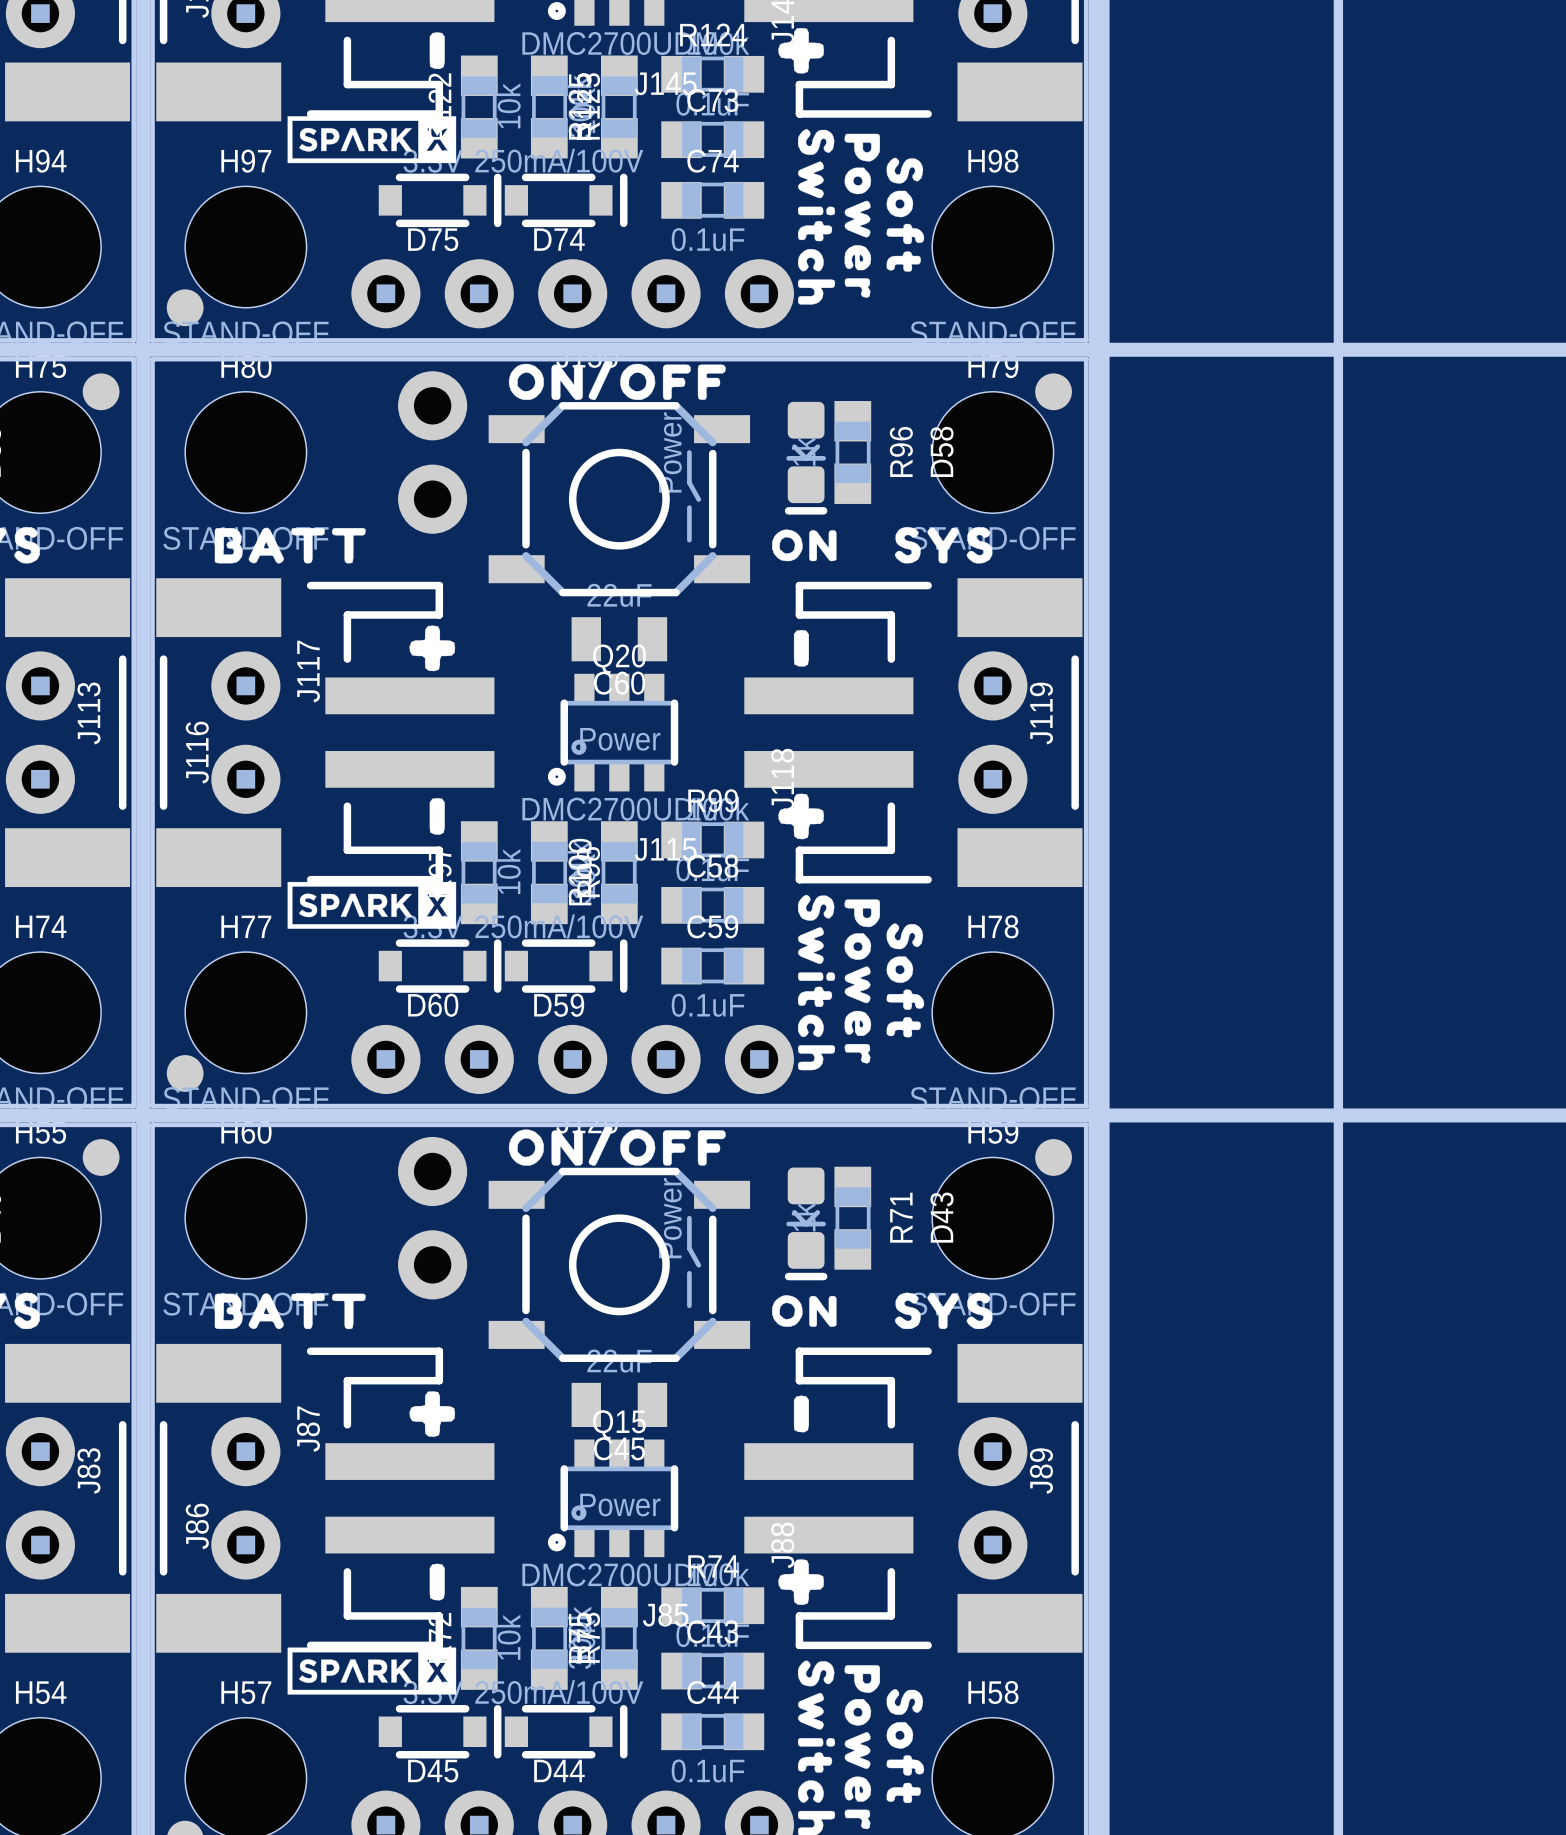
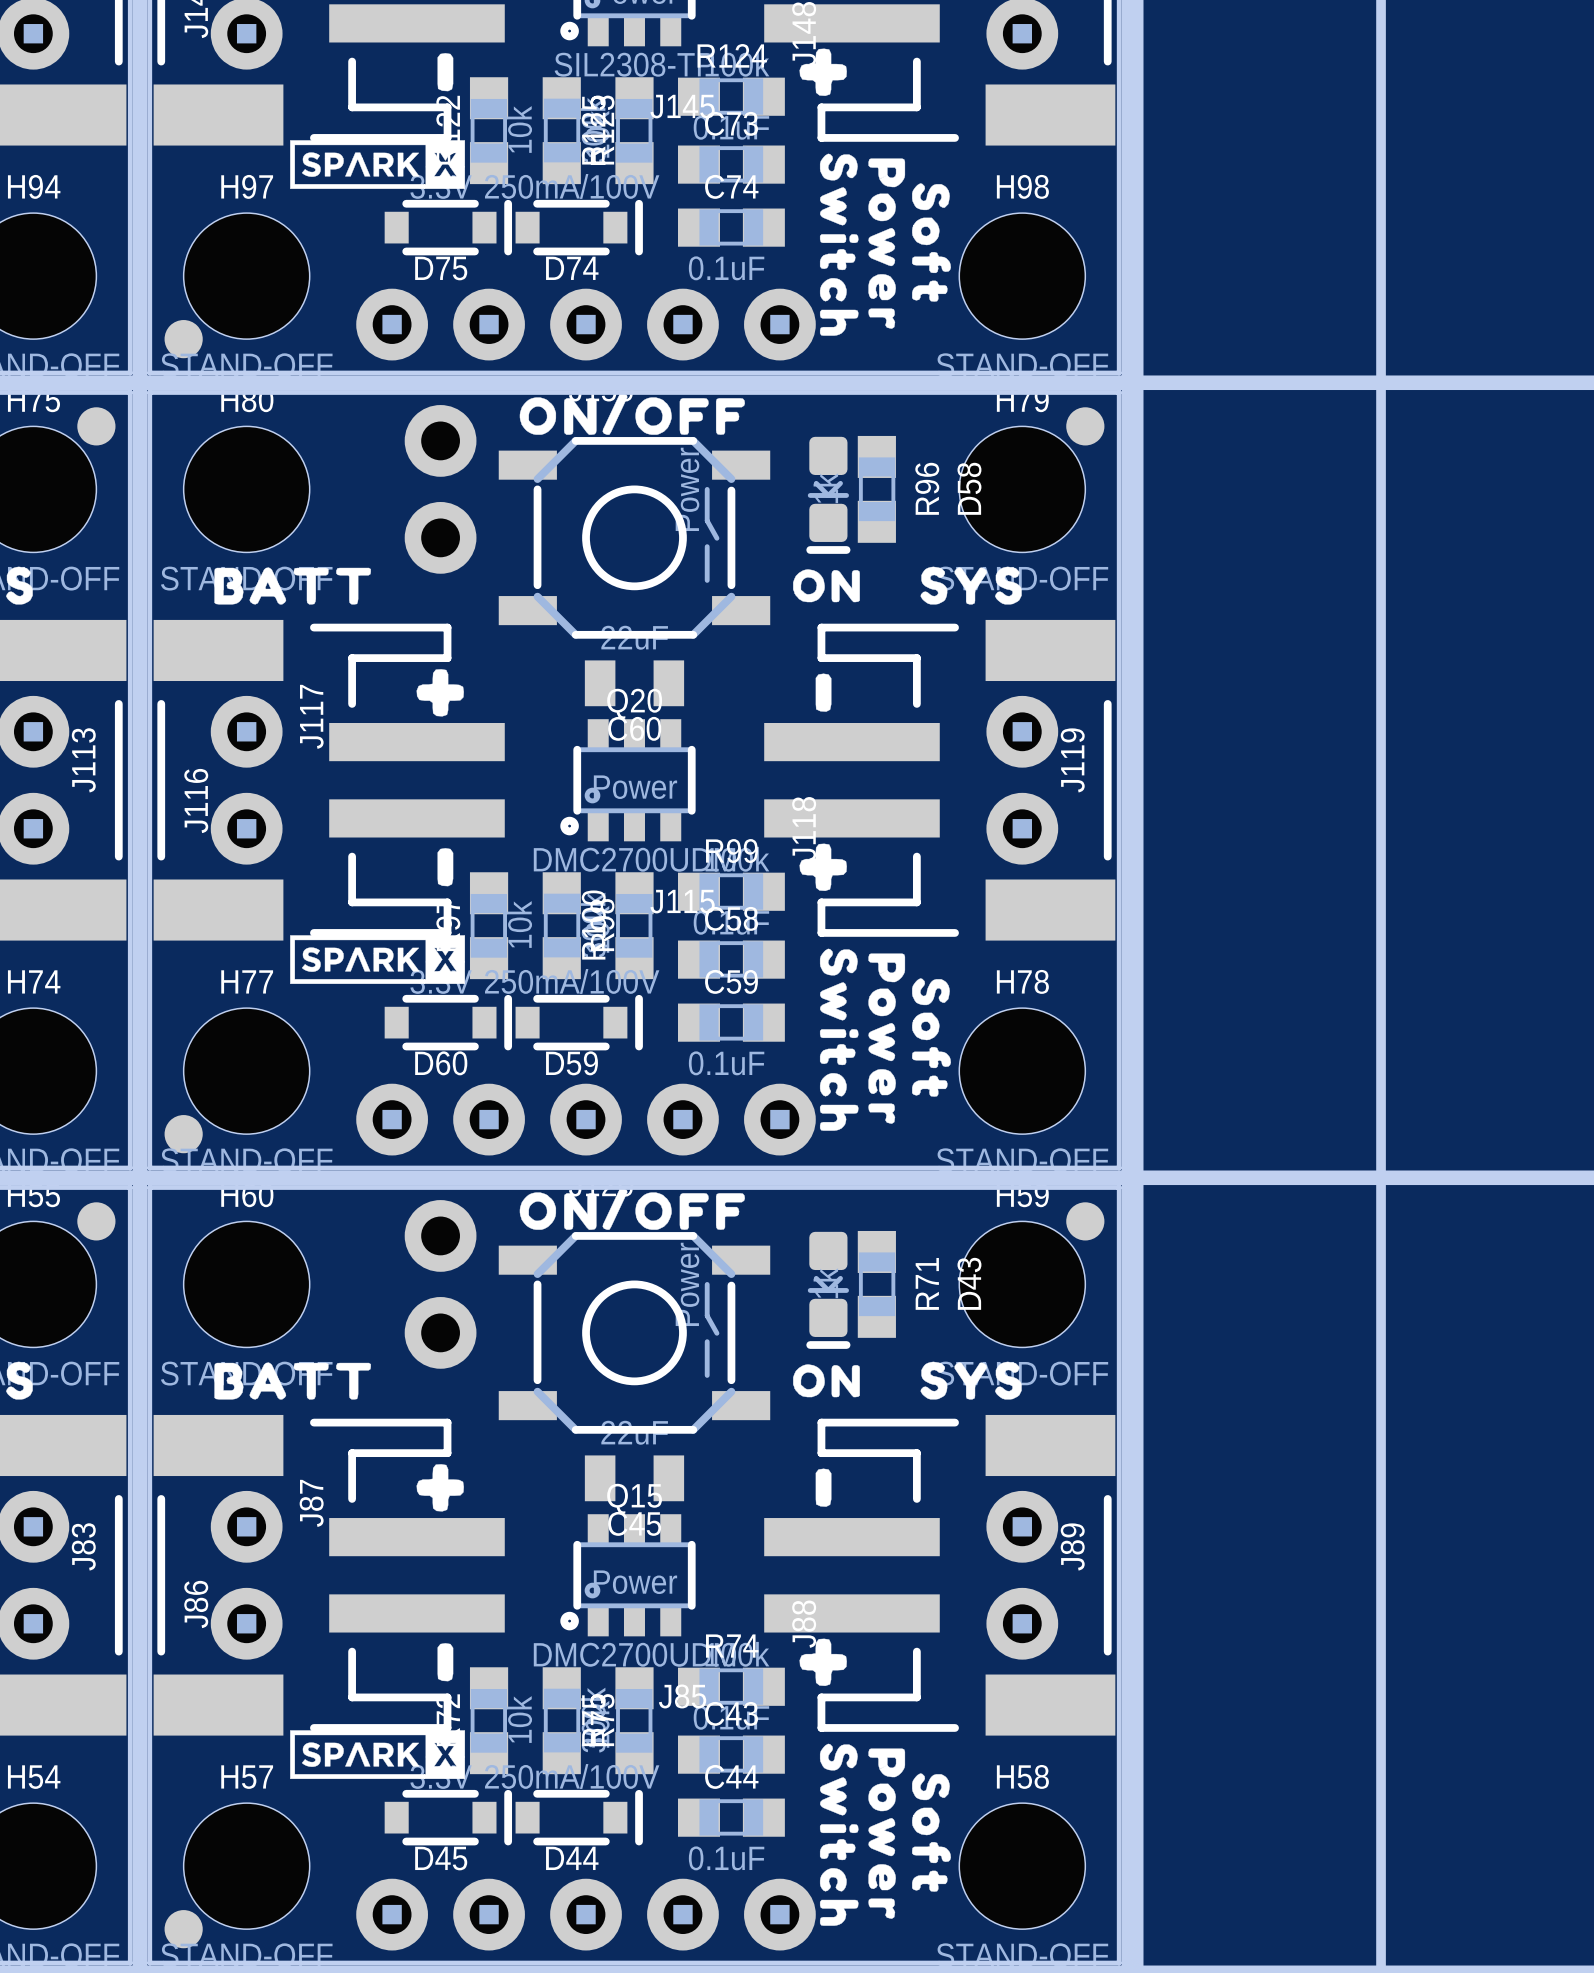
part value: DMC2700UDM (619, 43) -> SIL2308-TP (634, 64)

